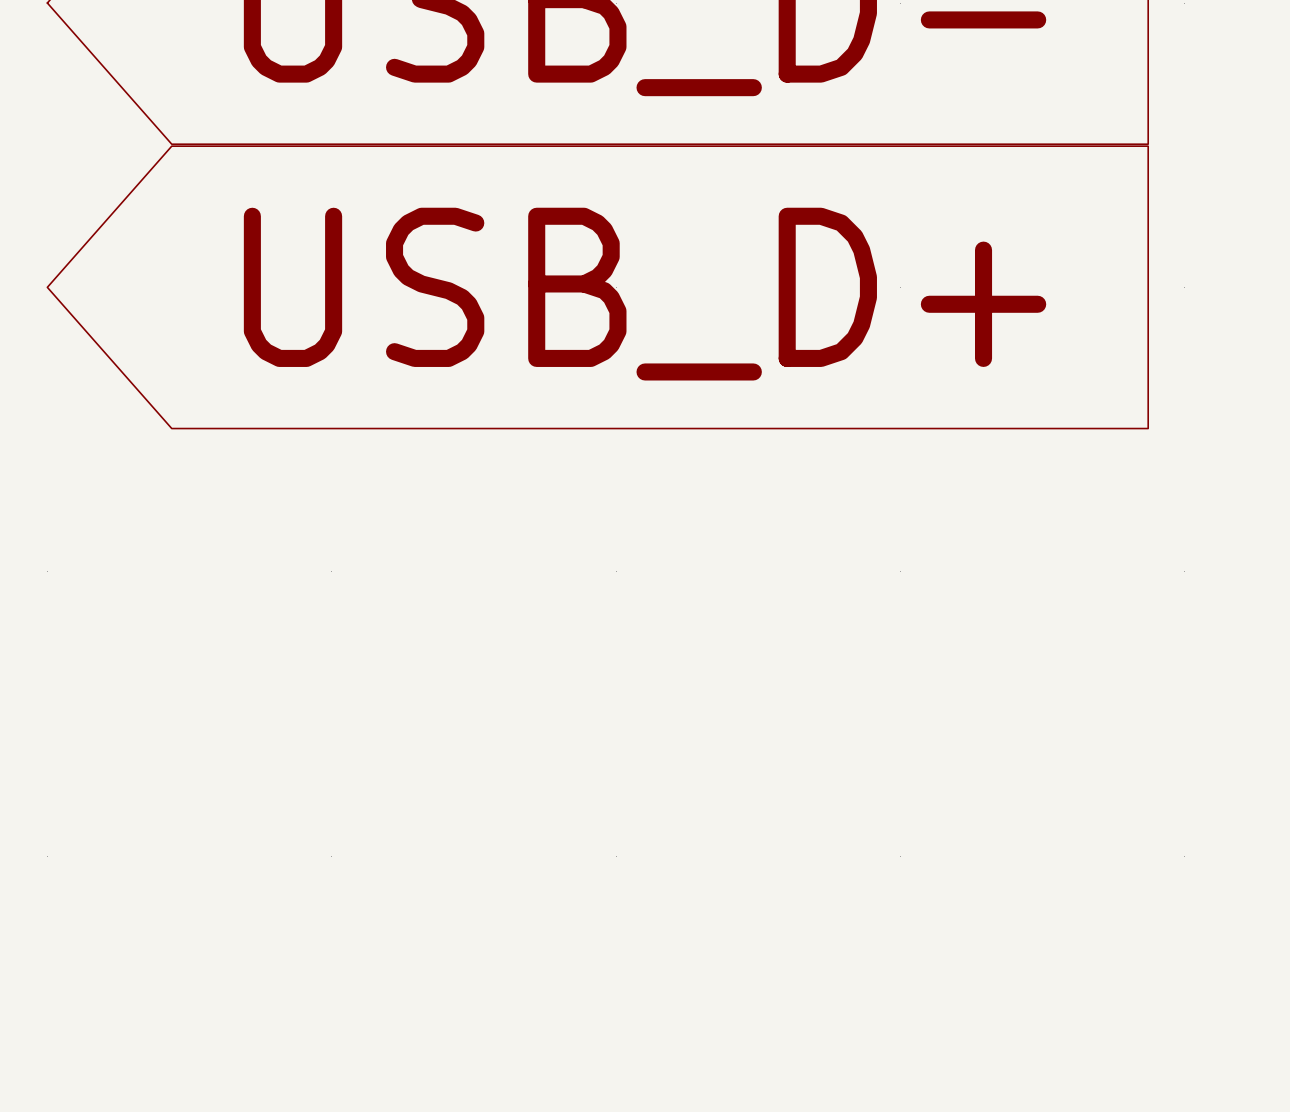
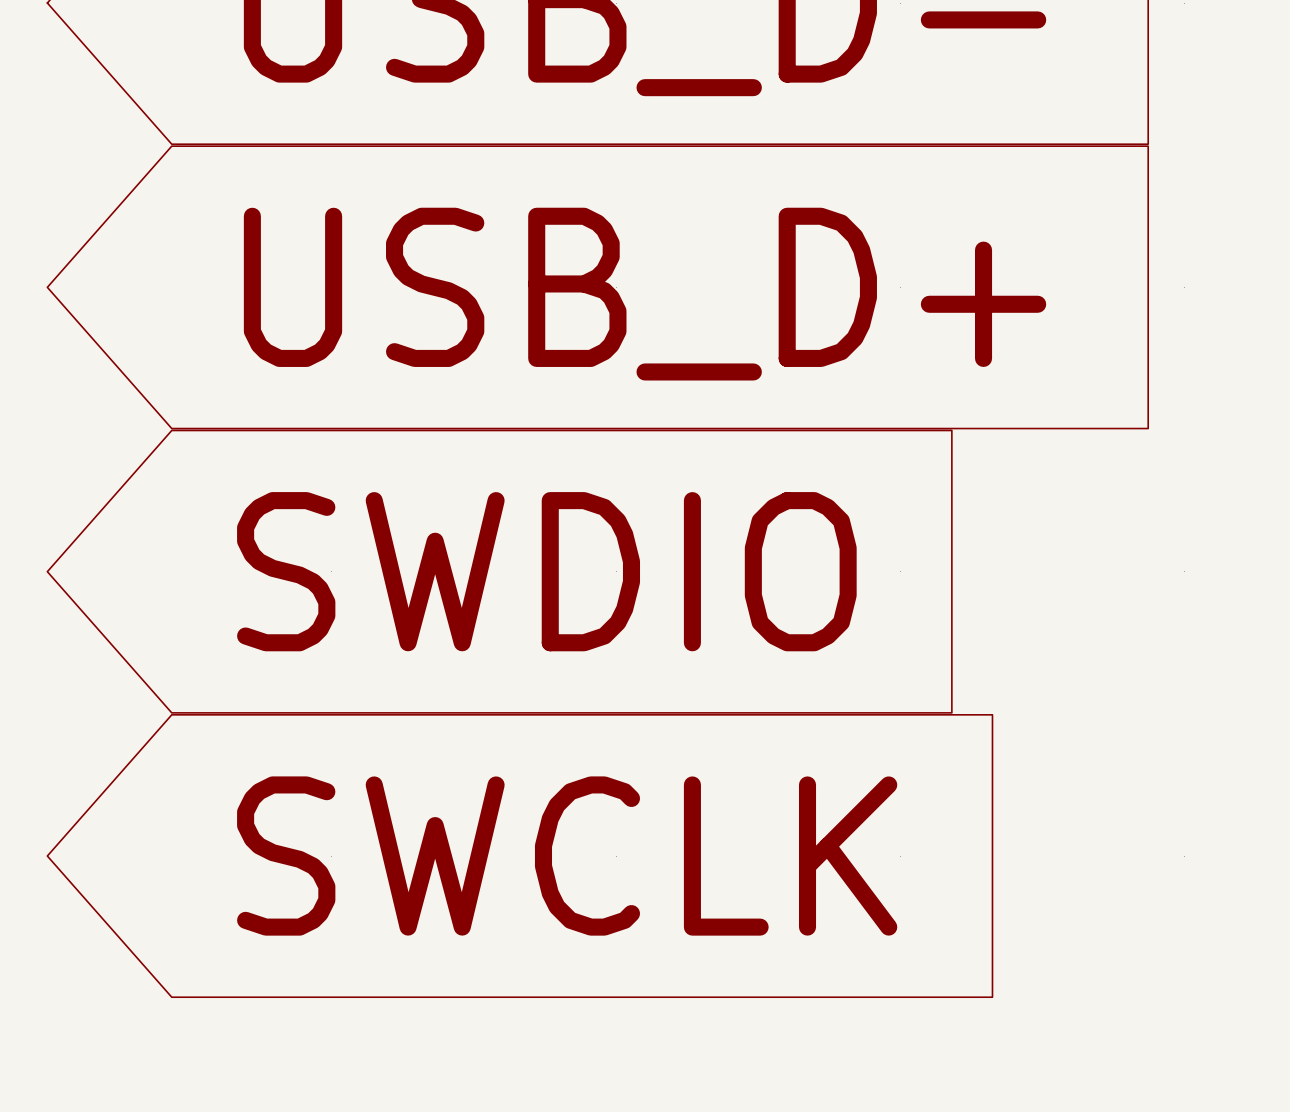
global label: none -> SWDIO (546, 571)
global label: none -> SWCLK (567, 856)

